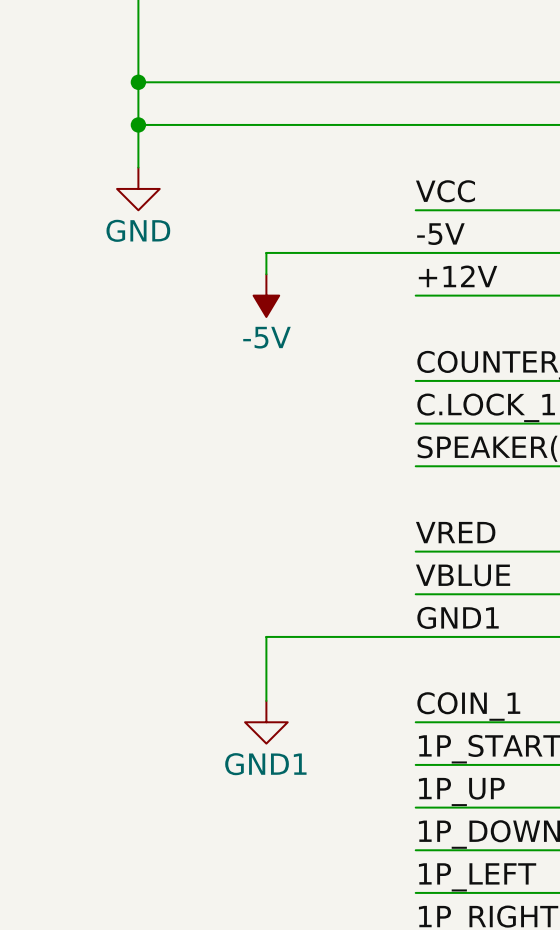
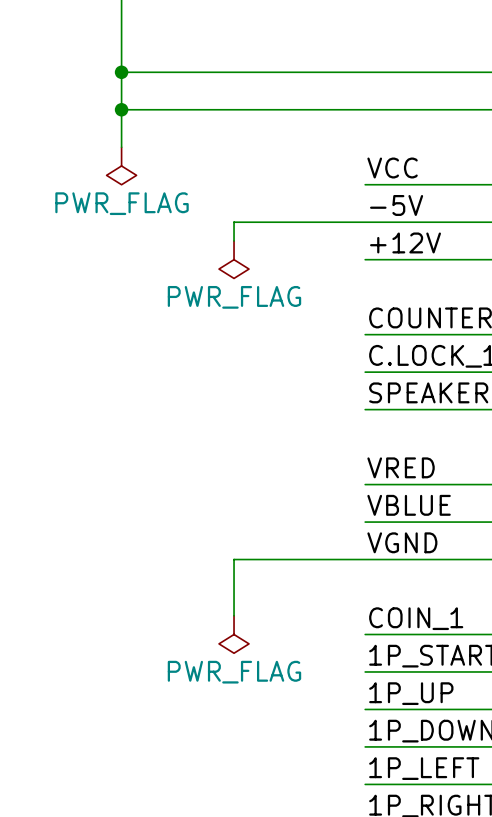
power symbol: GND (138, 188) -> PWR_FLAG (121, 165)
power symbol: -5V (266, 295) -> PWR_FLAG (234, 259)
label: GND1 (458, 617) -> VGND (402, 542)
power symbol: GND1 (266, 722) -> PWR_FLAG (234, 634)

